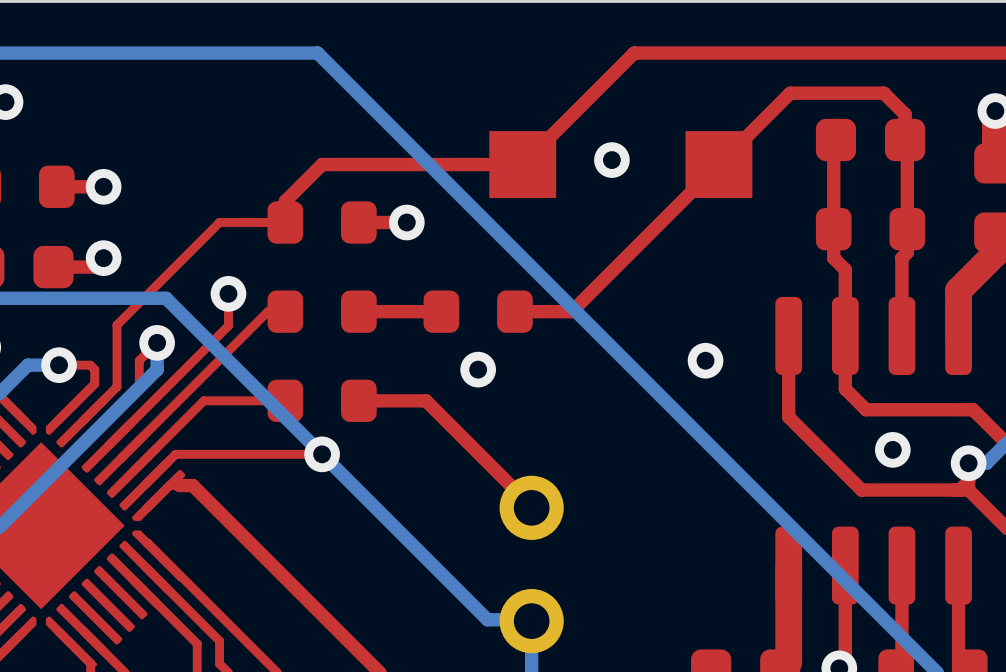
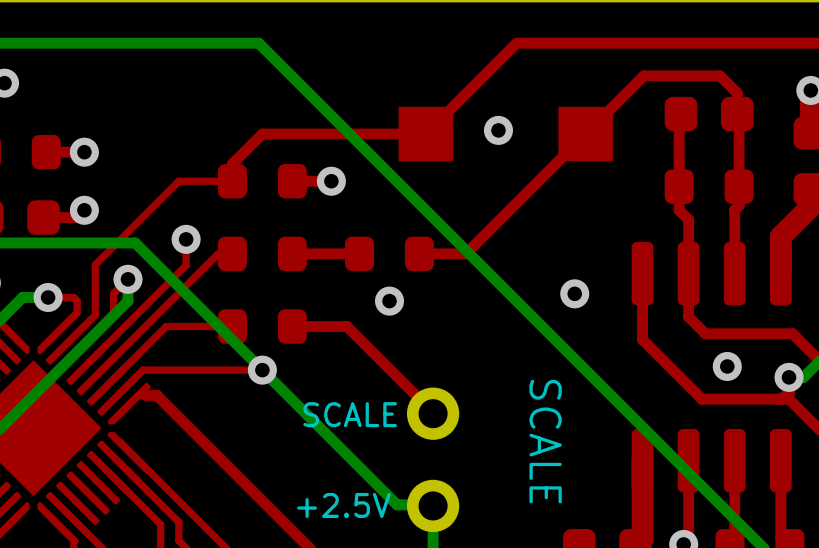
text: none -> SCALE (350, 414)
text: none -> SCALE (545, 441)
text: none -> +2.5V (343, 505)

